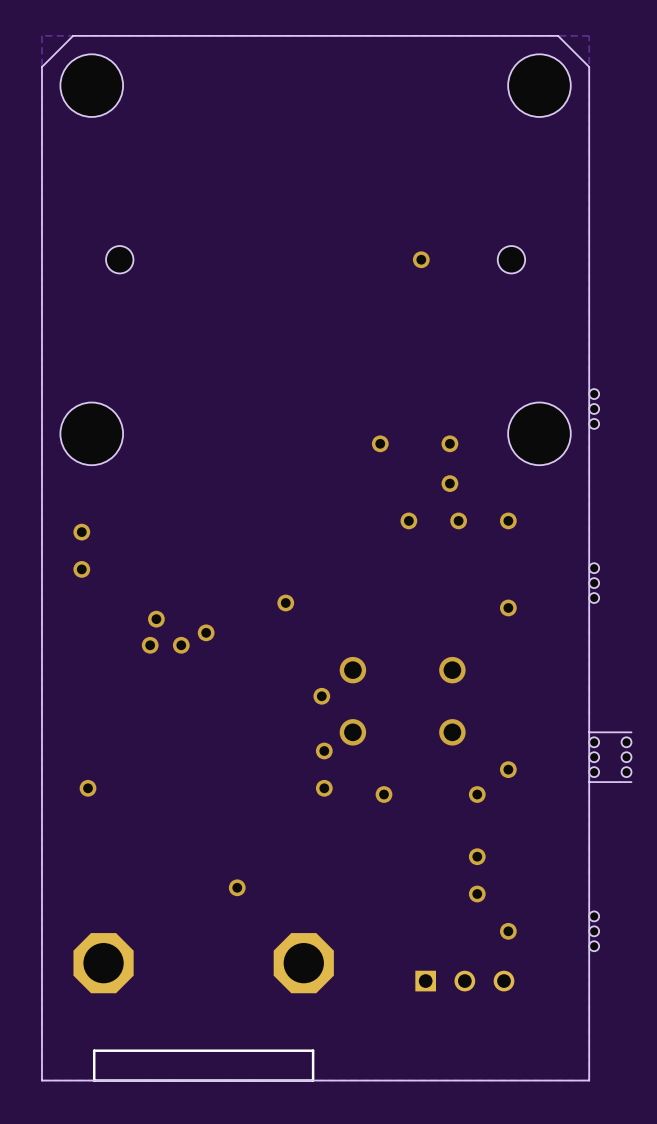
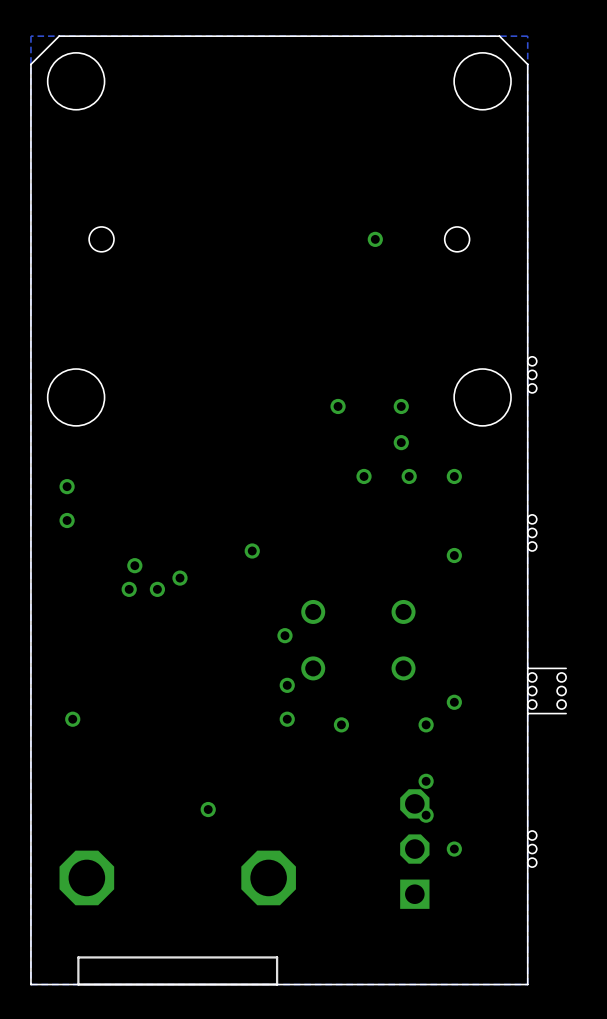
part: none -> (414, 849)
part: (464, 981) -> none

